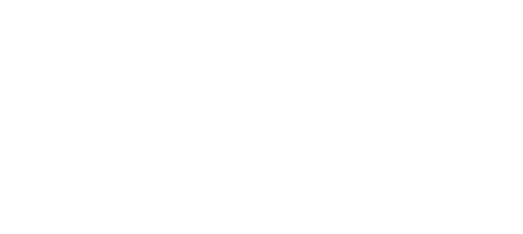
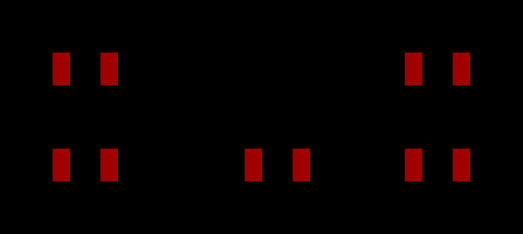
part: none -> (85, 68)
part: none -> (437, 68)
part: none -> (85, 164)
part: none -> (277, 164)
part: none -> (437, 164)

